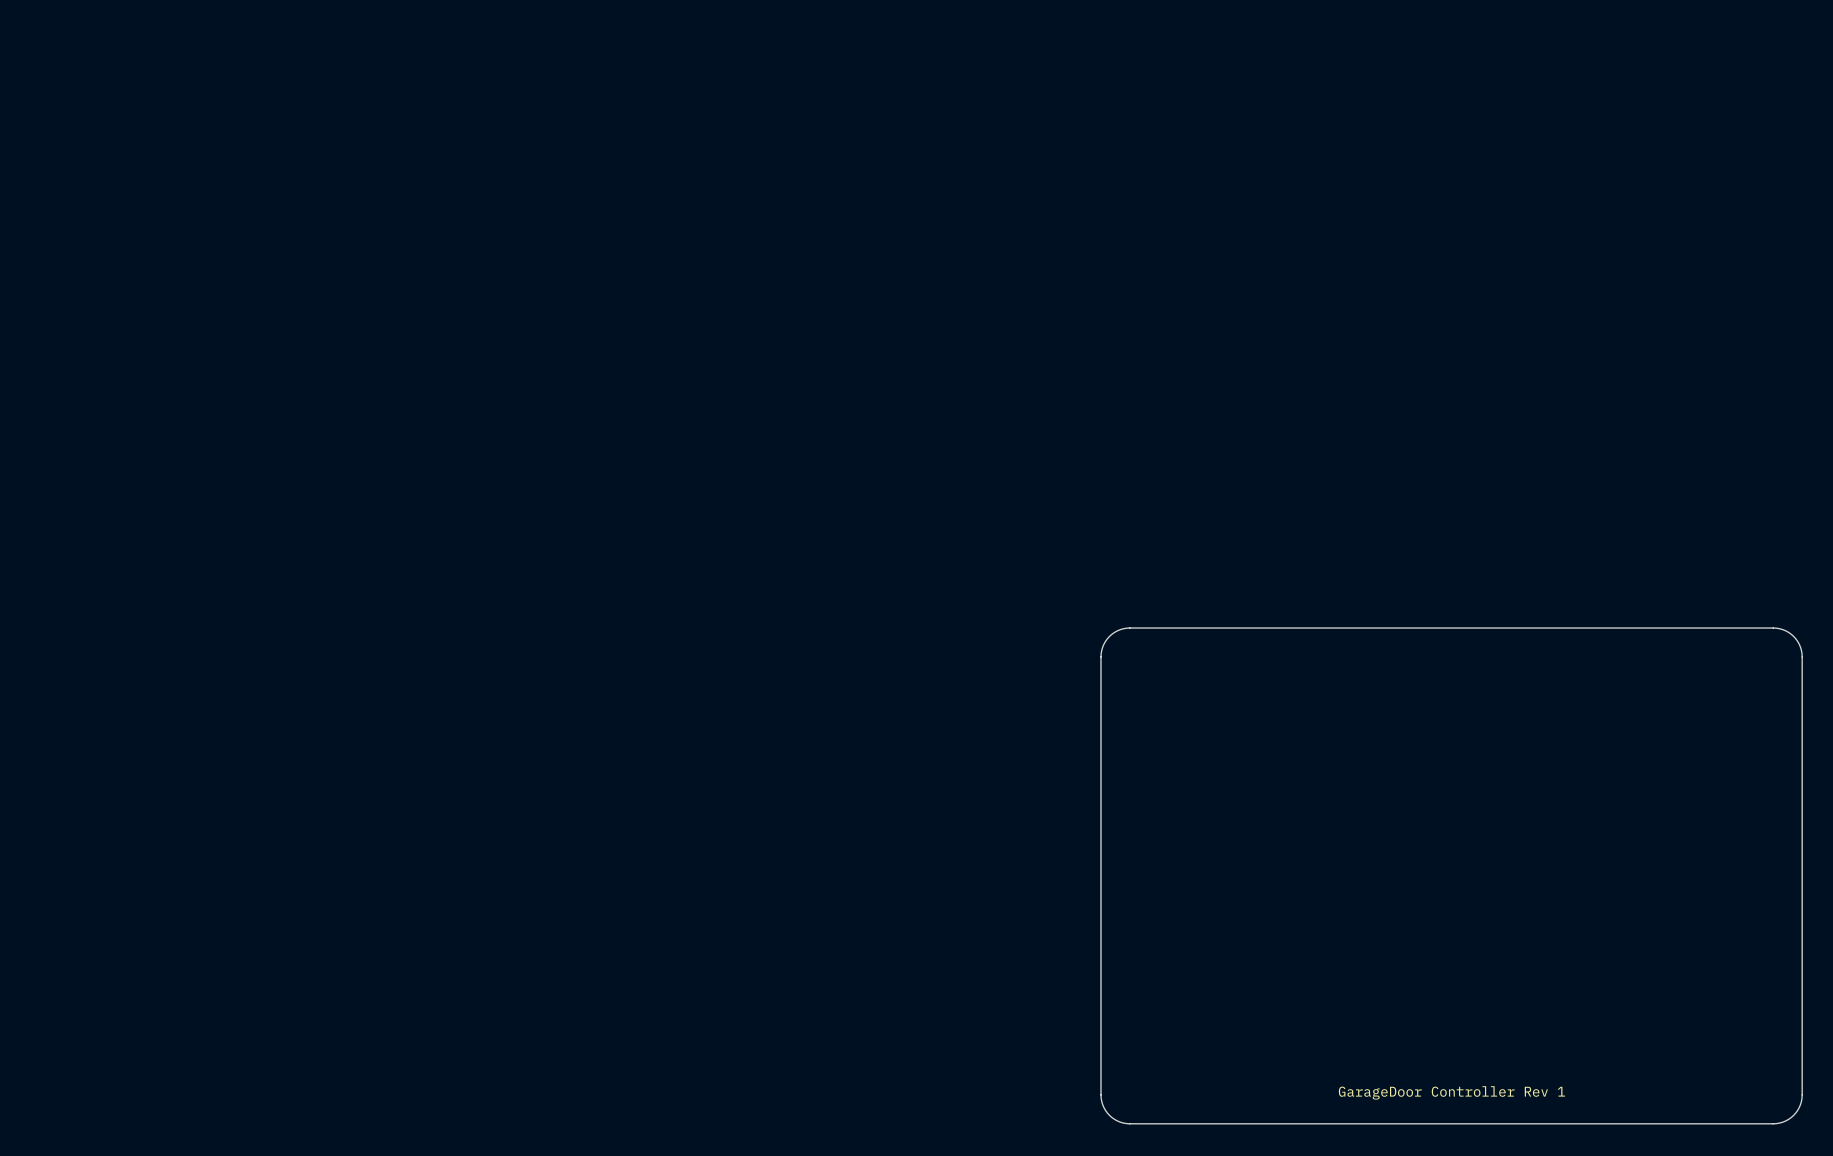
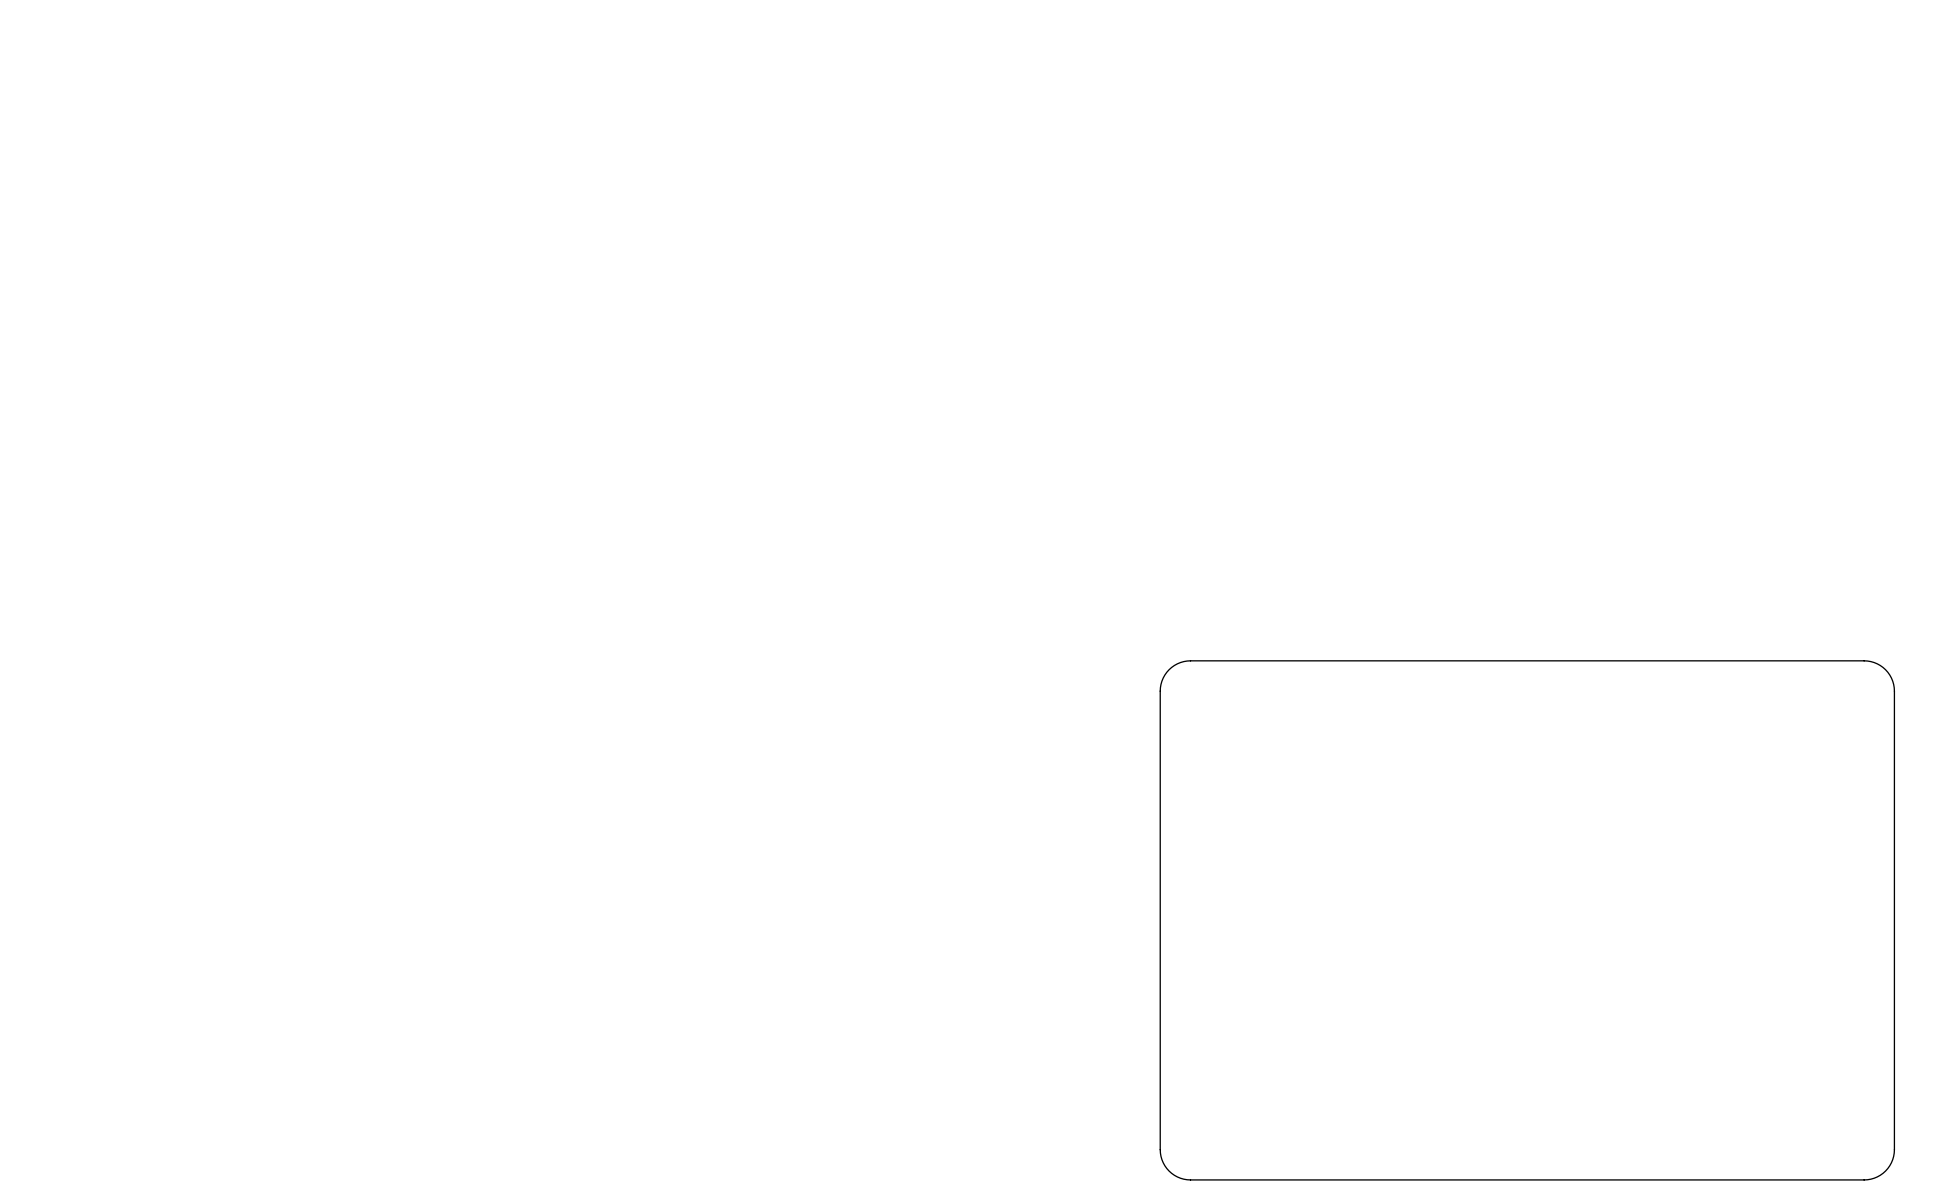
text: GarageDoor Controller Rev 1 (1451, 1092) -> none

